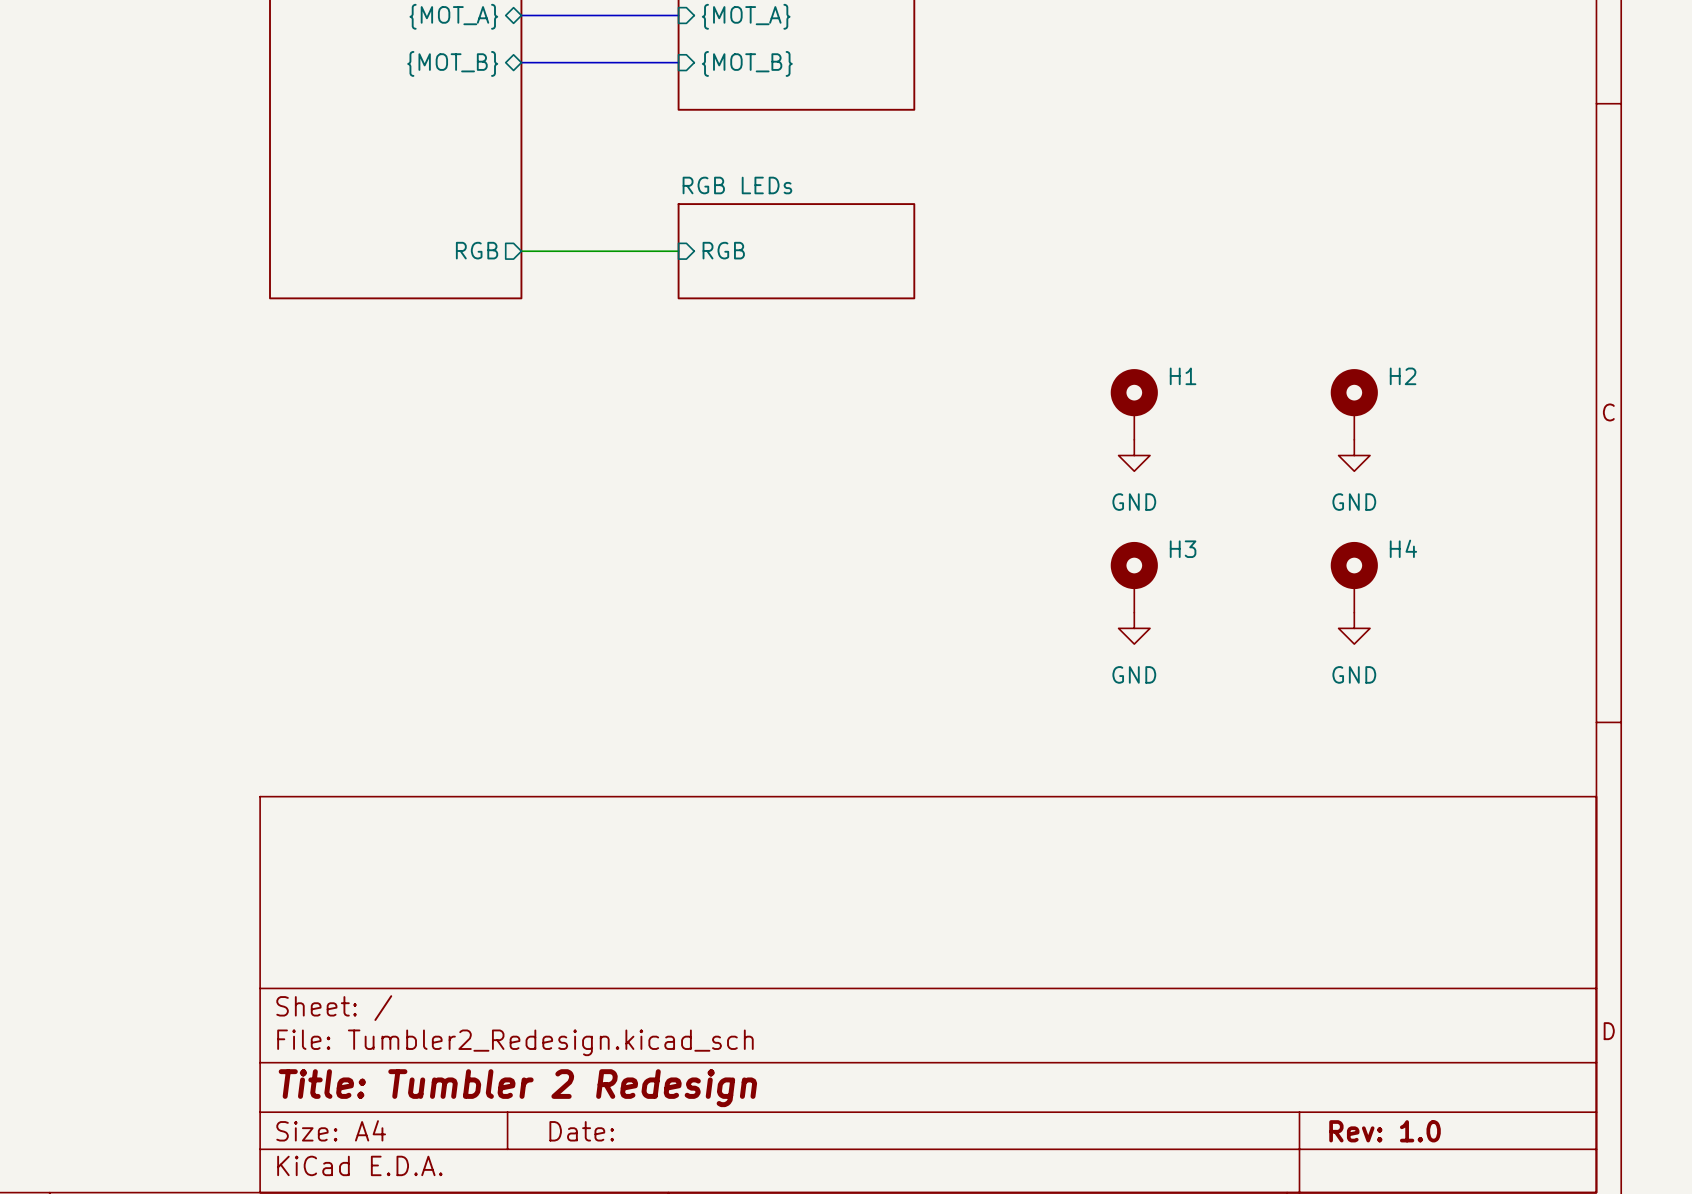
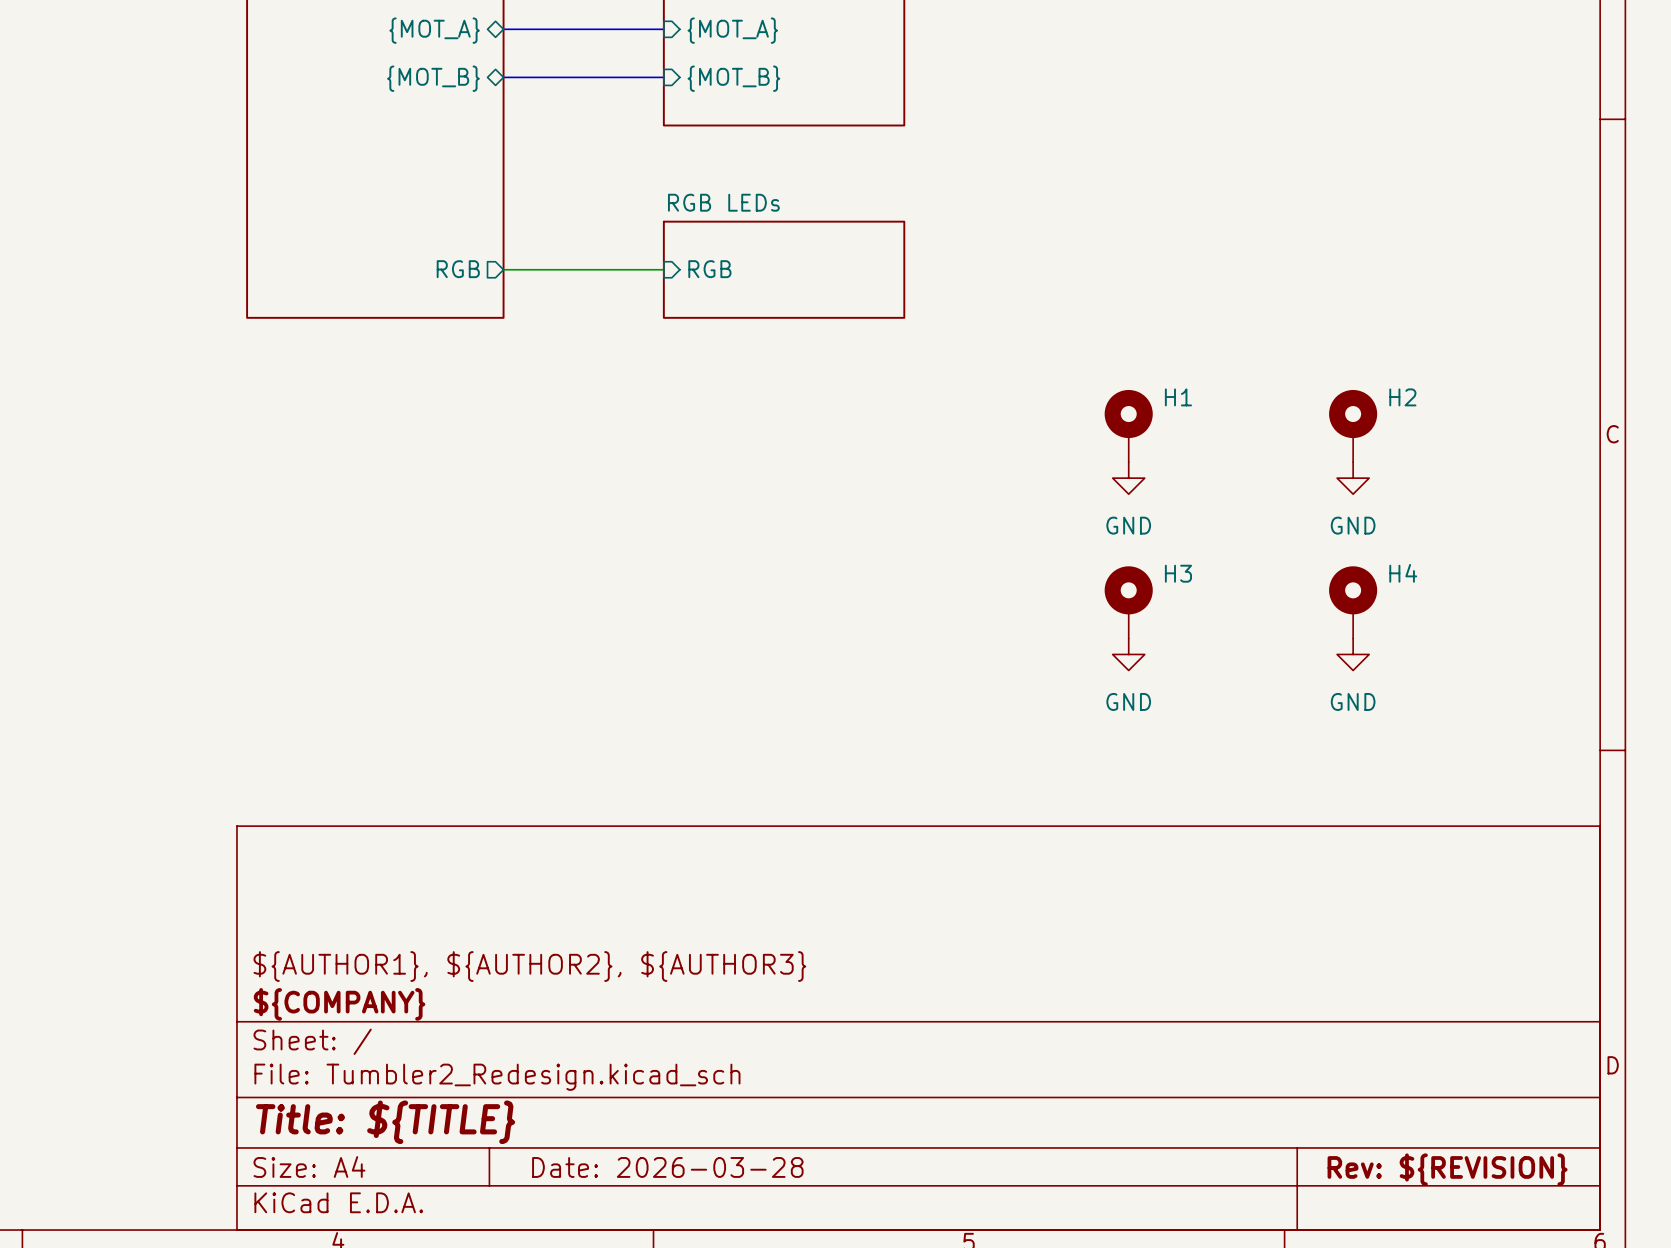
title block: none -> ${AUTHOR1}, ${AUTHOR2}, ${AUTHOR3} (529, 966)
title block: none -> ${COMPANY} (339, 1004)
title block: Title: Tumbler 2 Redesign (517, 1088) -> Title: ${TITLE} (385, 1122)
title block: Date: (581, 1131) -> Date: 2026-03-28 (667, 1167)
title block: Rev: 1.0 (1385, 1131) -> Rev: ${REVISION} (1447, 1169)

